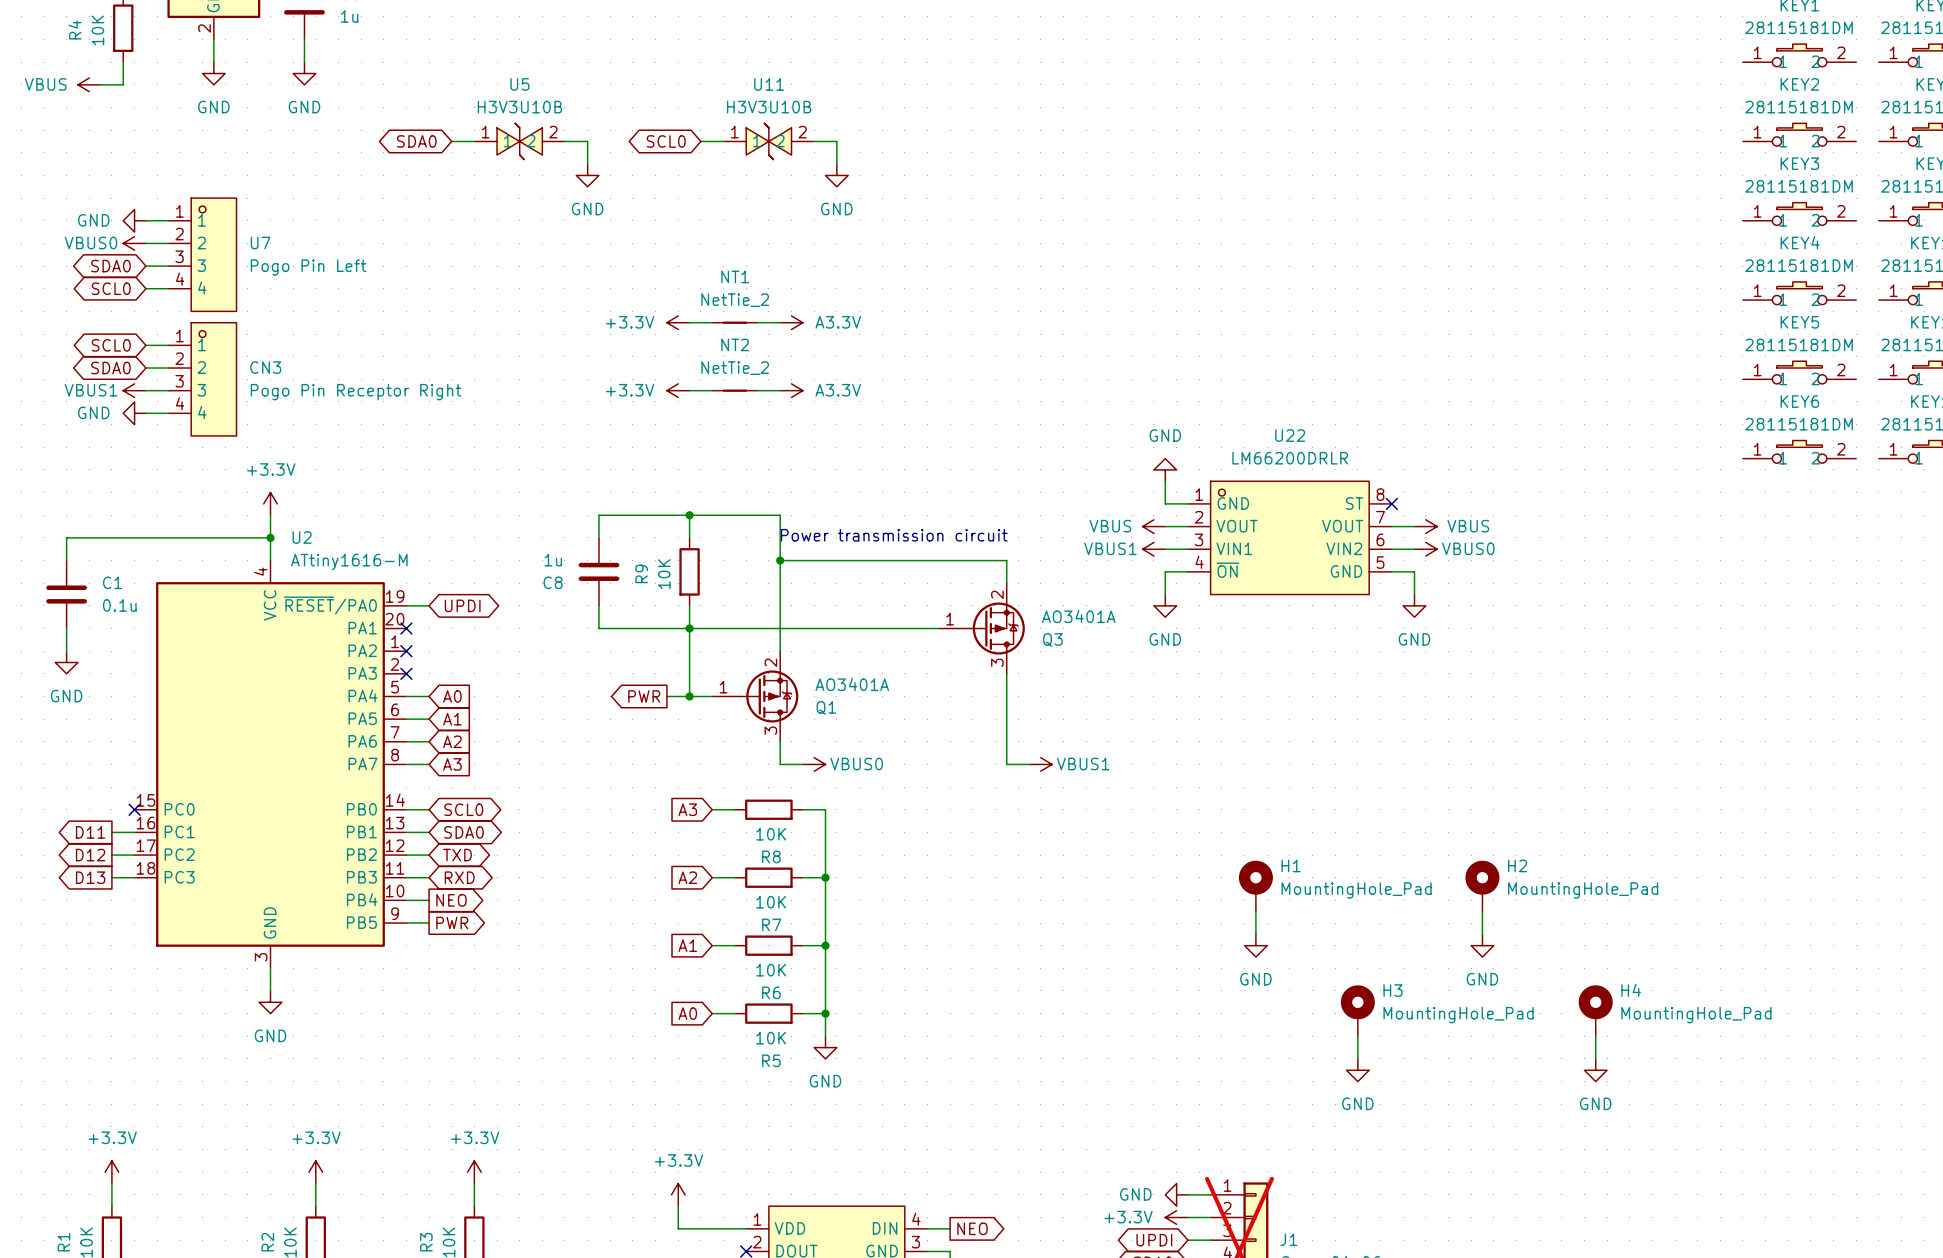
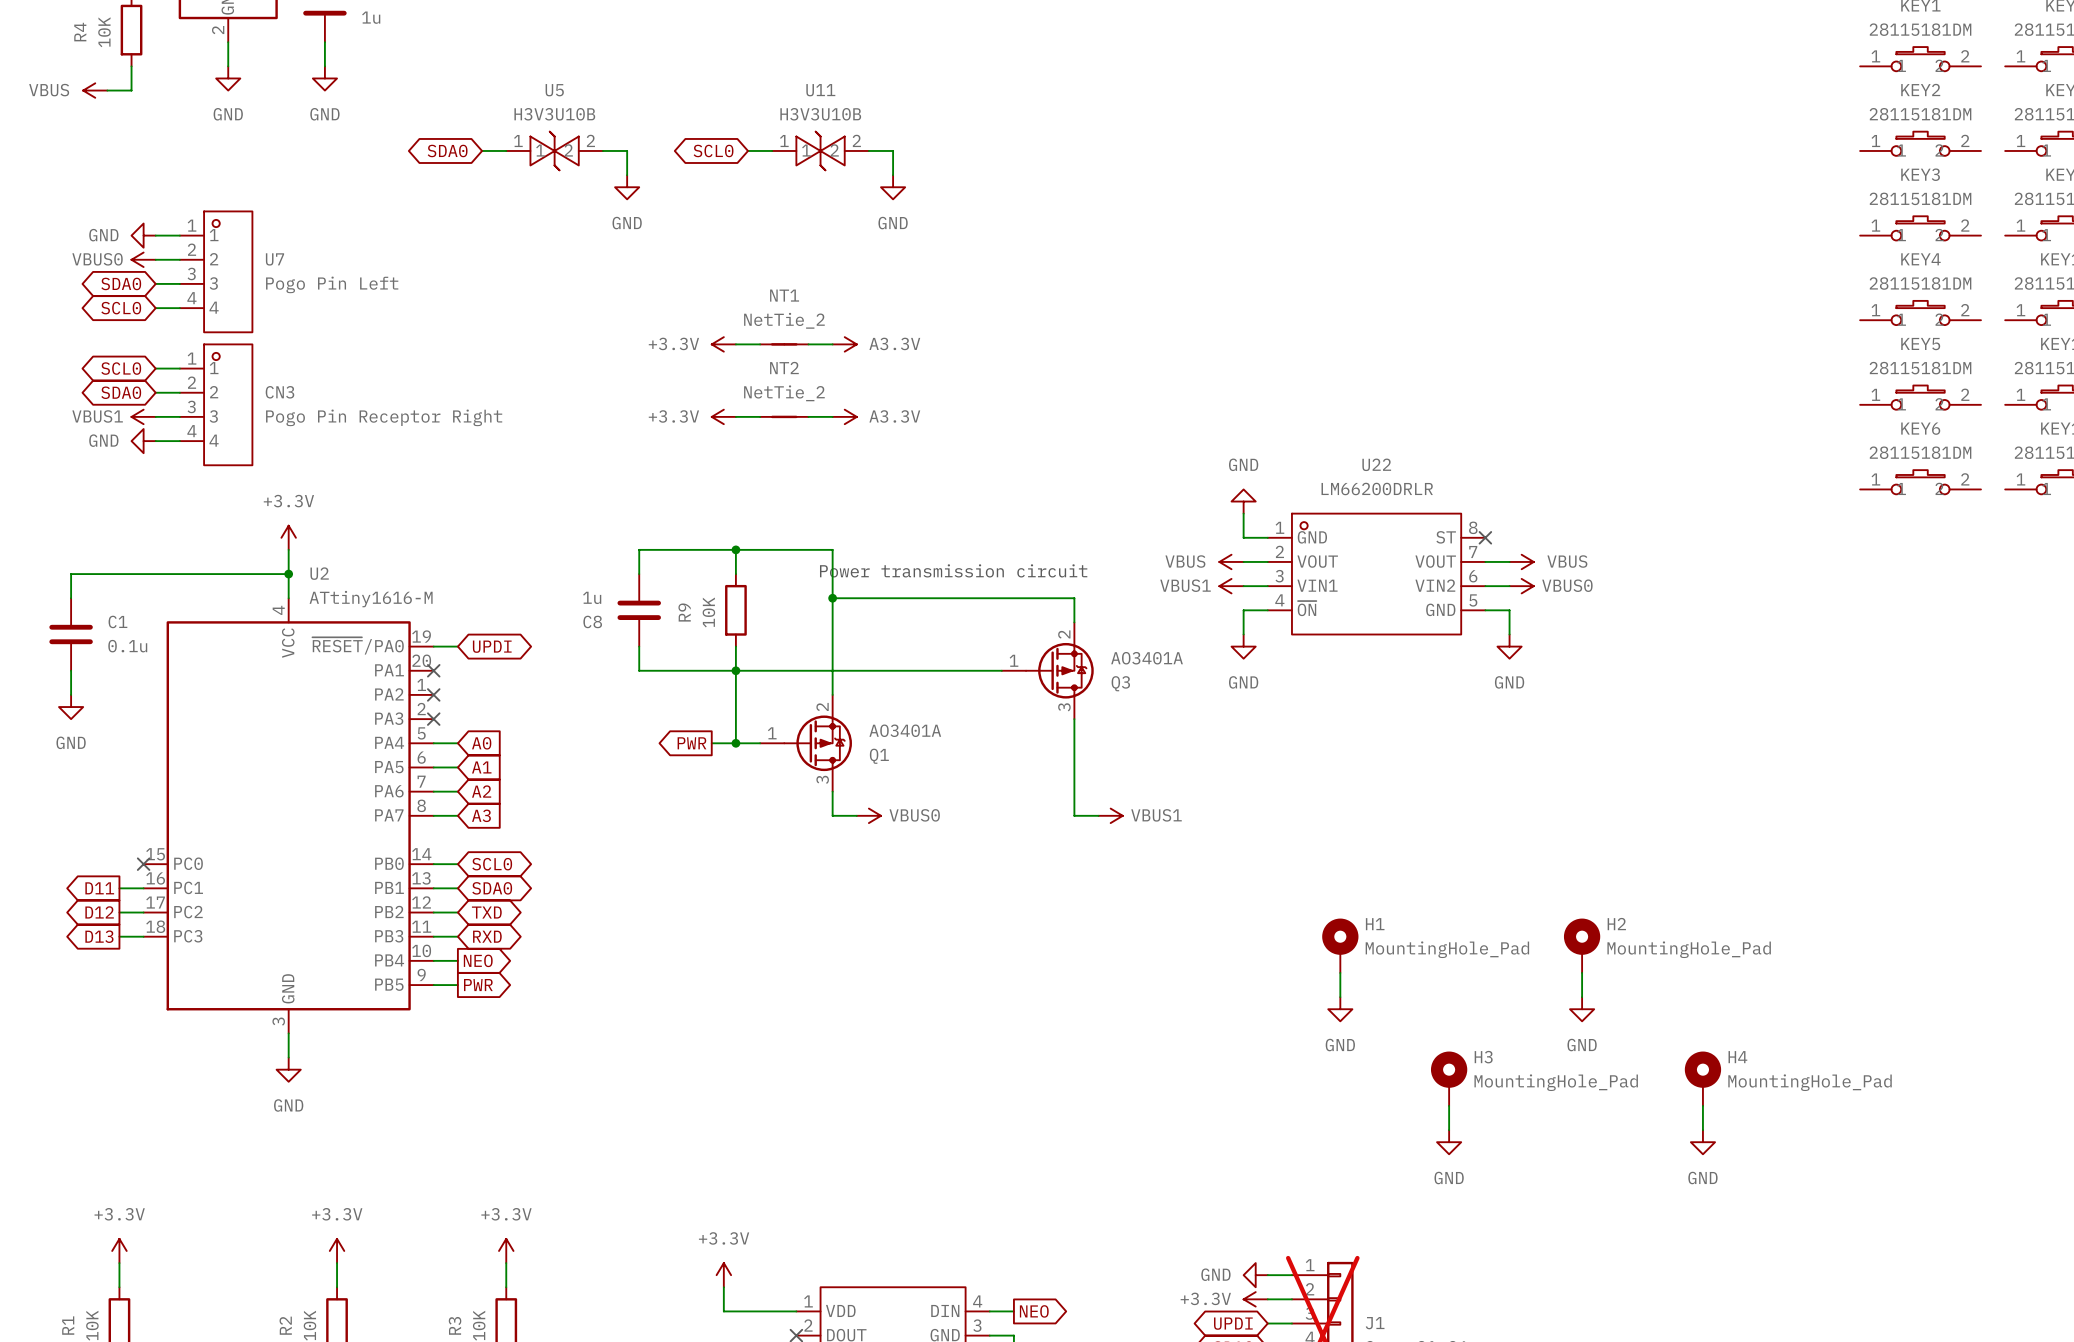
global label: A3 (687, 809) -> none
wire: (712, 809) (734, 809) -> none
R8: 10K (768, 809) -> none
wire: (802, 809) (825, 809) (825, 1036) -> none
global label: A2 (687, 877) -> none
wire: (712, 877) (734, 877) -> none
R7: 10K (768, 877) -> none
wire: (802, 877) (825, 877) -> none
junction: (825, 877) -> none
global label: A1 (687, 945) -> none
wire: (712, 945) (734, 945) -> none
R6: 10K (768, 945) -> none
wire: (802, 945) (825, 945) -> none
junction: (825, 945) -> none
global label: A0 (687, 1013) -> none
wire: (712, 1013) (734, 1013) -> none
R5: 10K (768, 1013) -> none
wire: (802, 1013) (825, 1013) -> none
junction: (825, 1013) -> none
power symbol: GND (825, 1047) -> none

